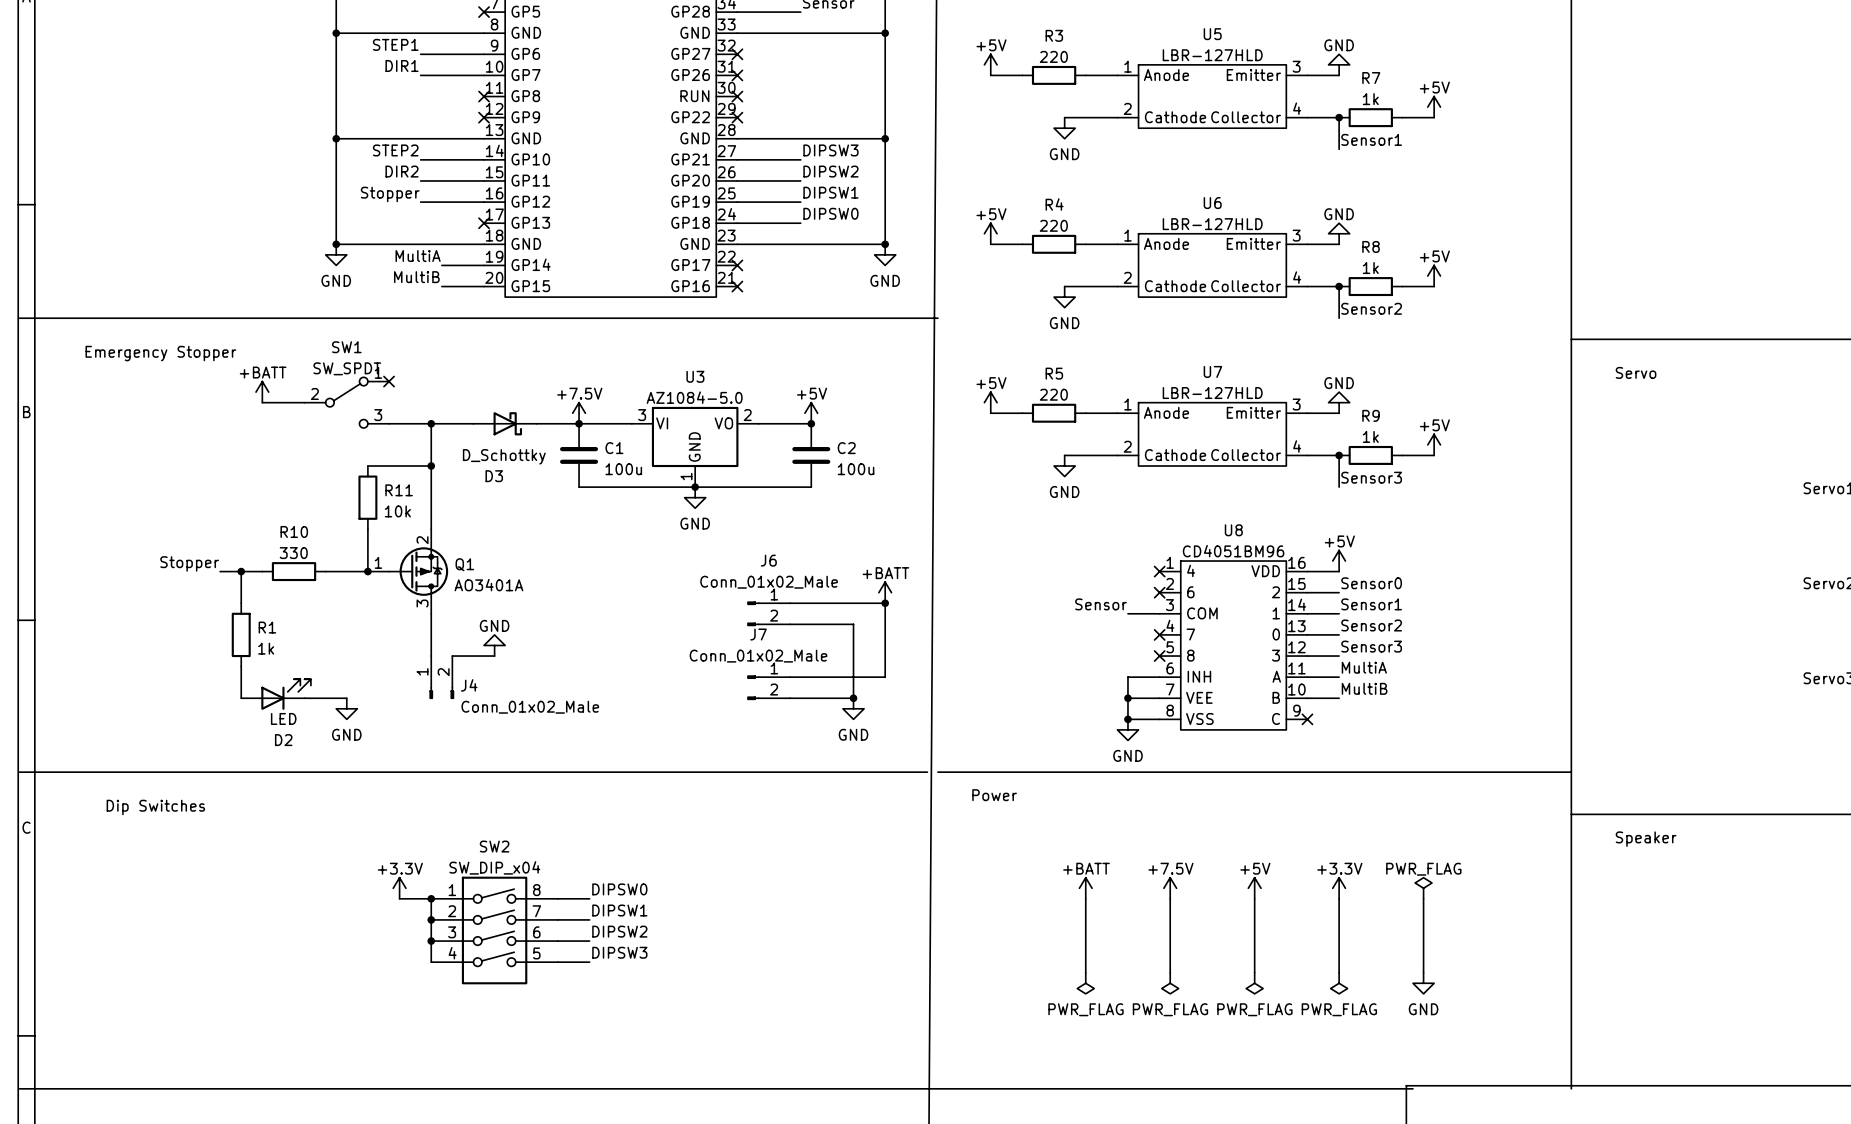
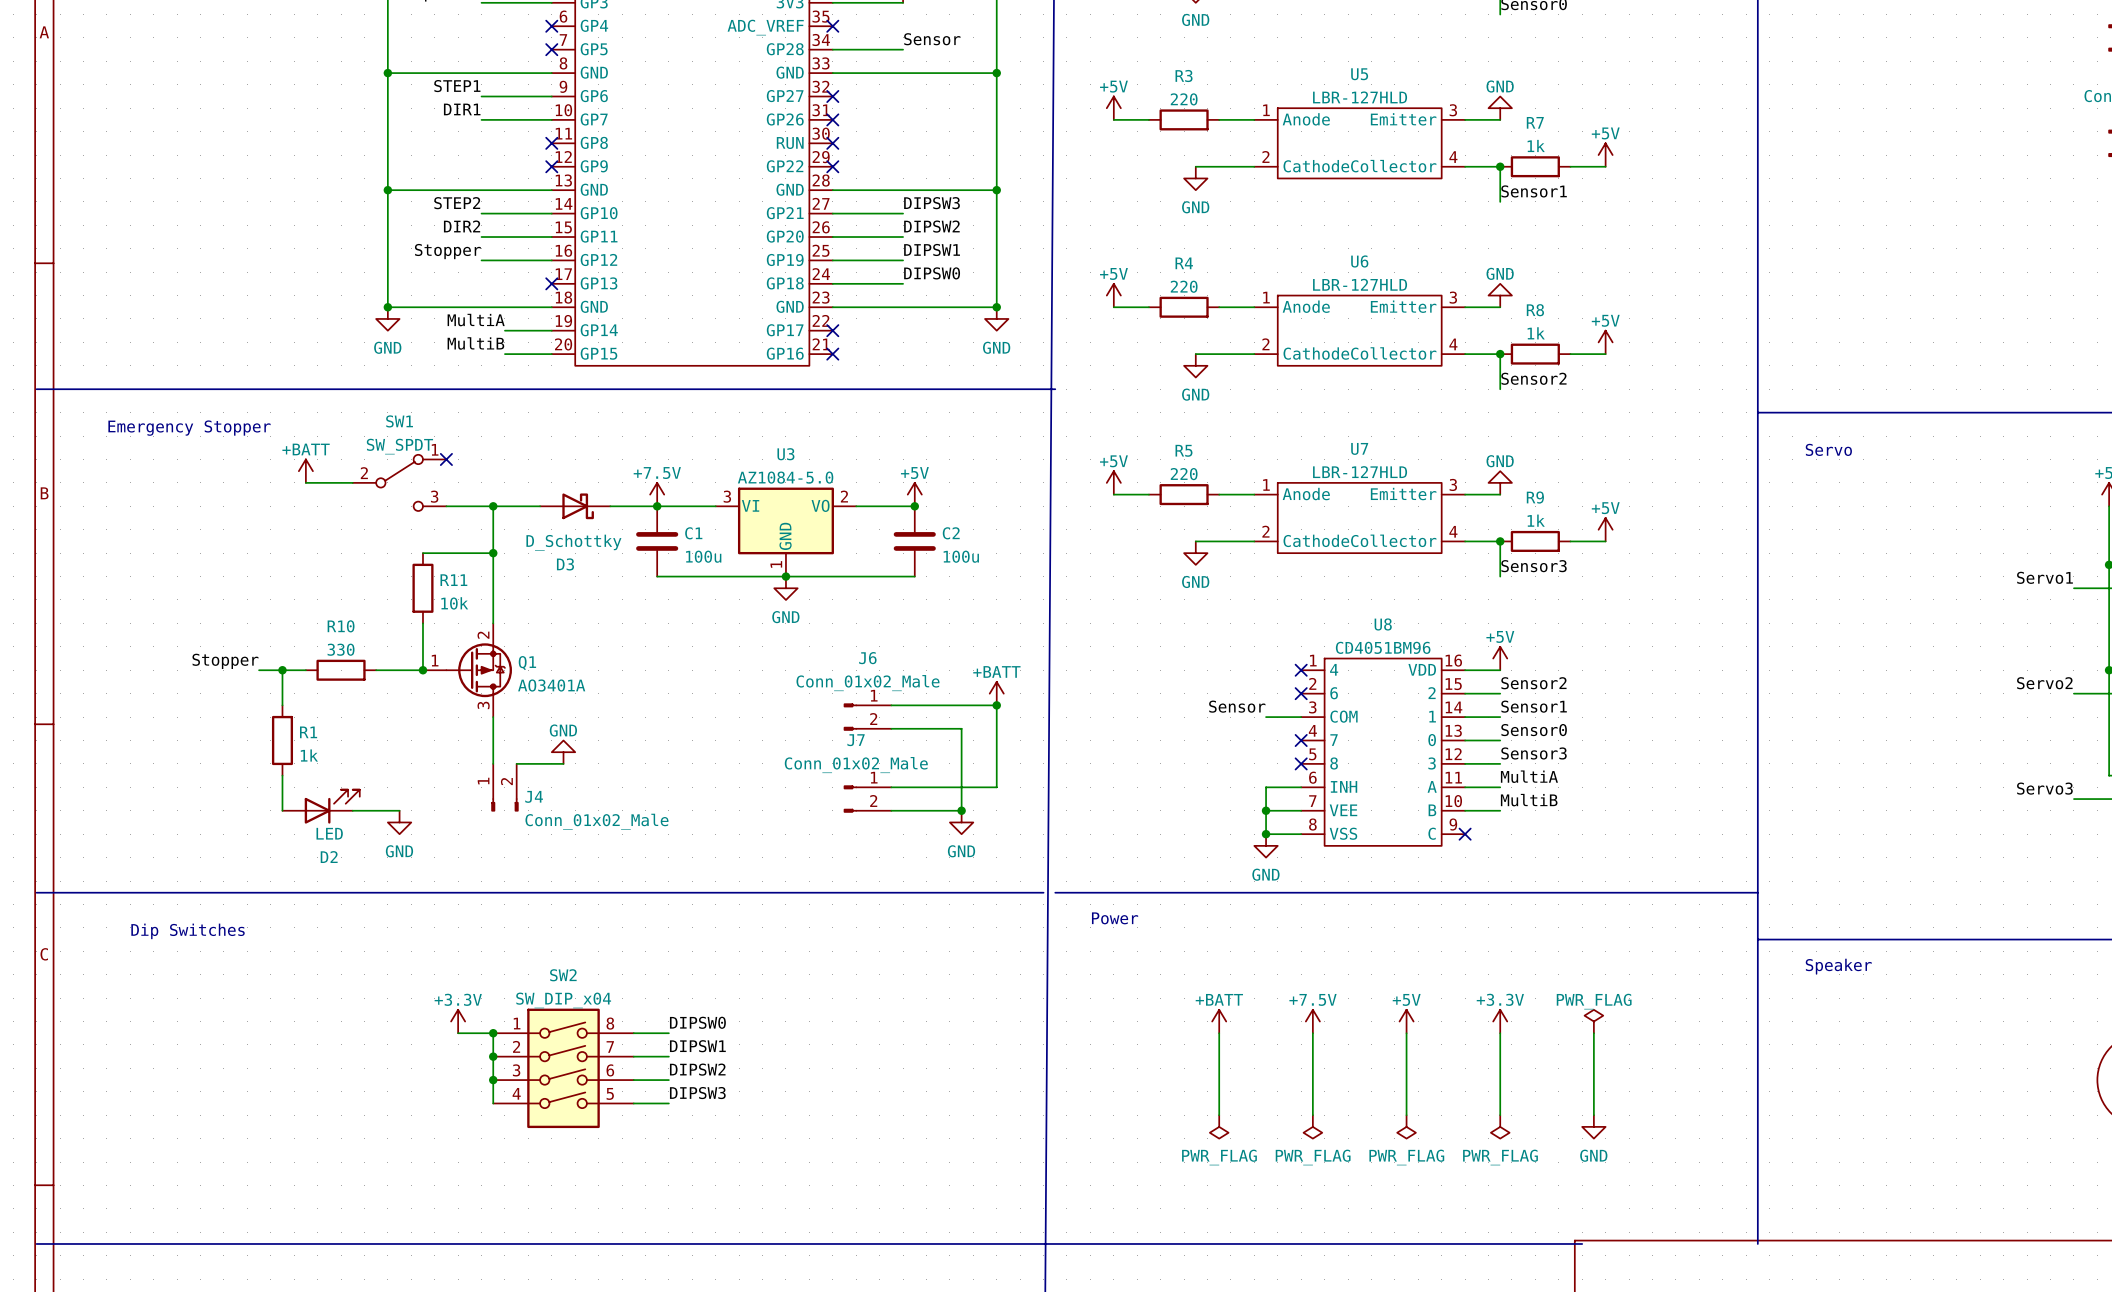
label: Sensor0 (1371, 583) -> Sensor2 (1533, 683)
label: Sensor2 (1371, 625) -> Sensor0 (1534, 730)

